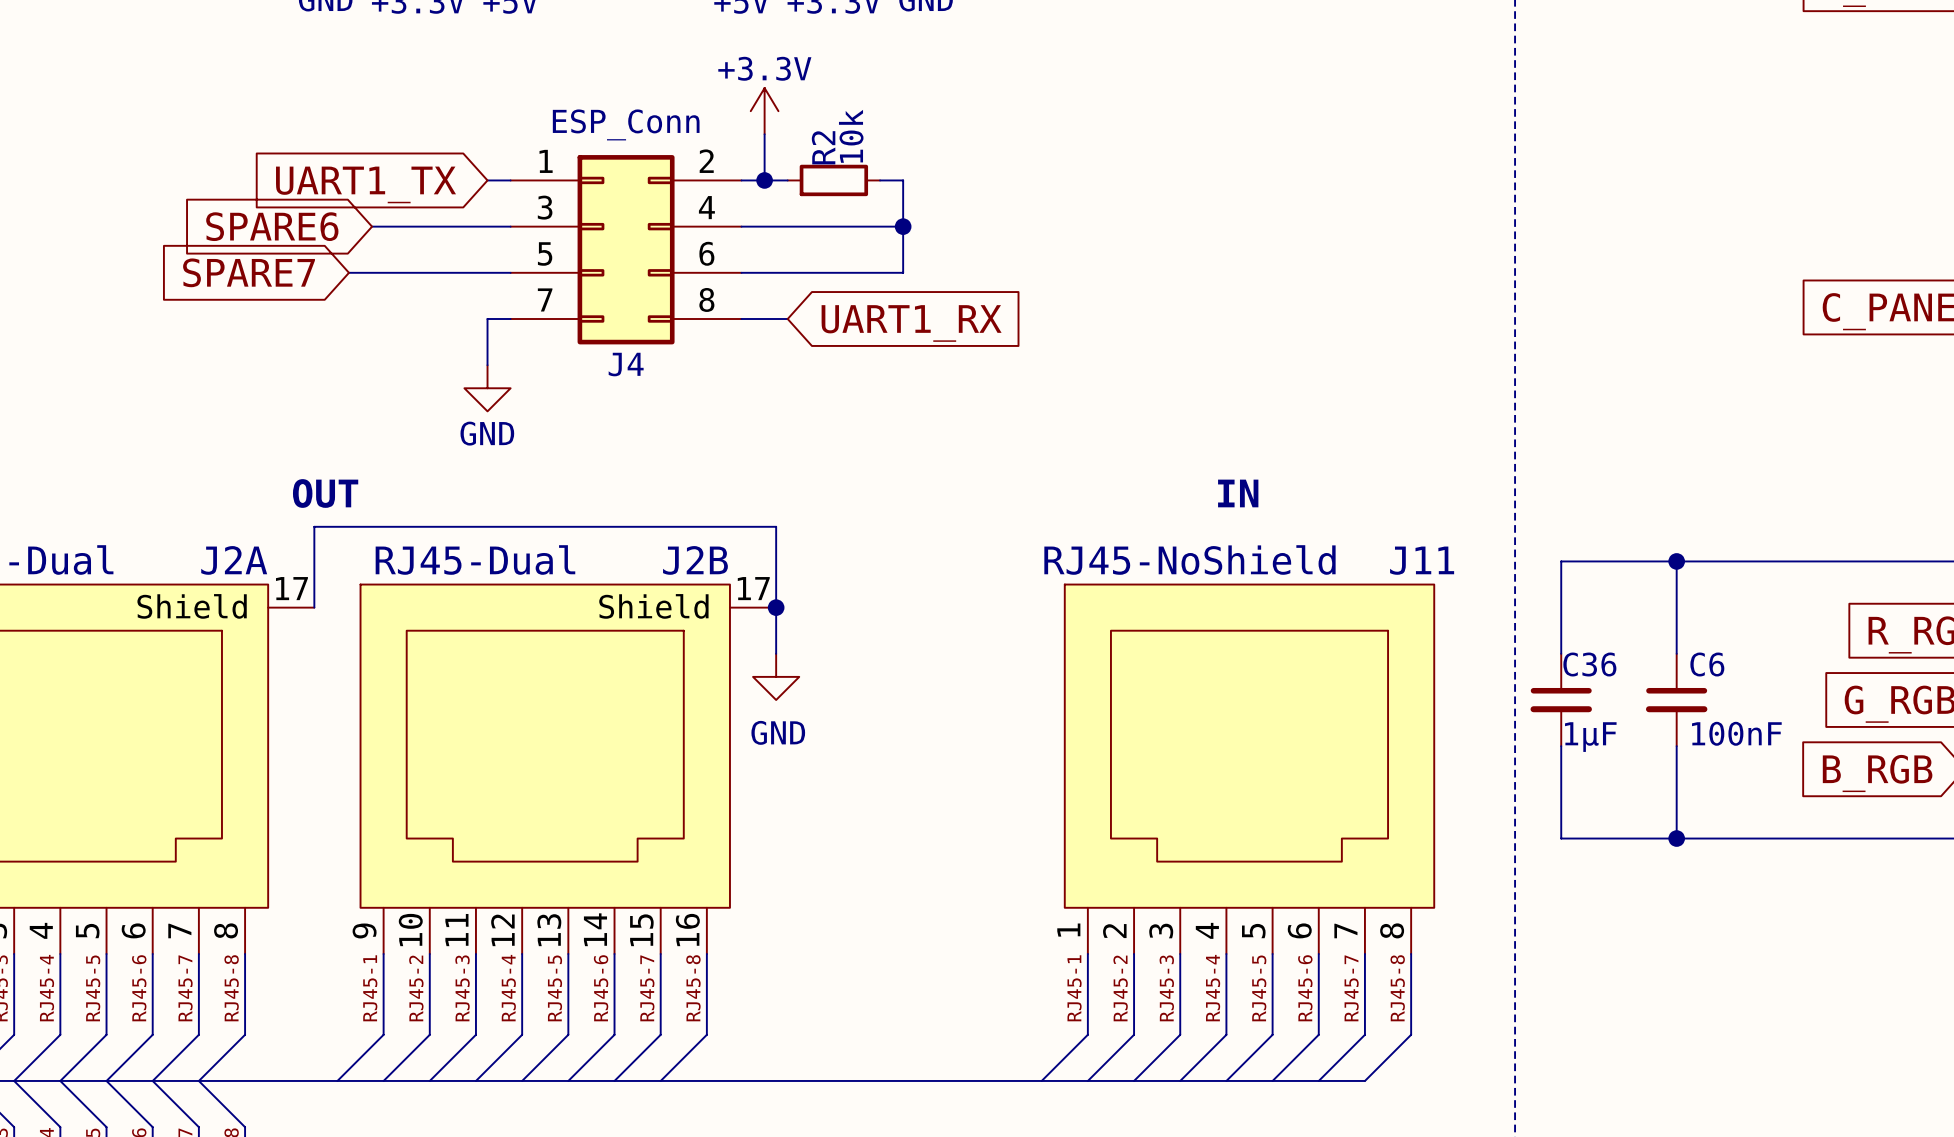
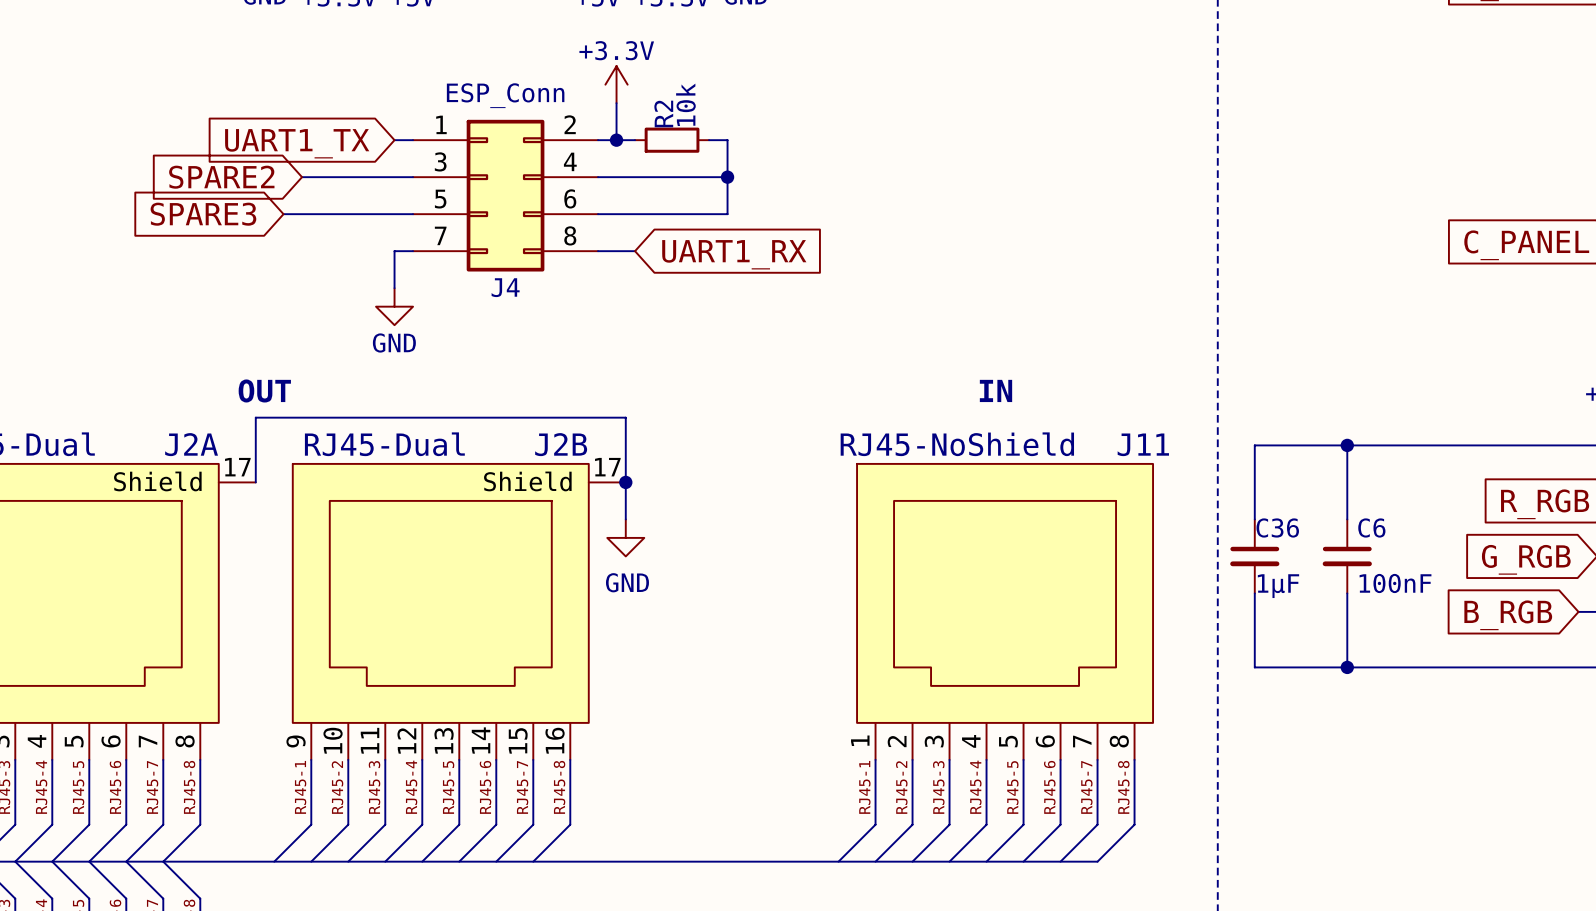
global label: SPARE6 (272, 226) -> SPARE2 (221, 177)
global label: SPARE7 (249, 272) -> SPARE3 (203, 214)

